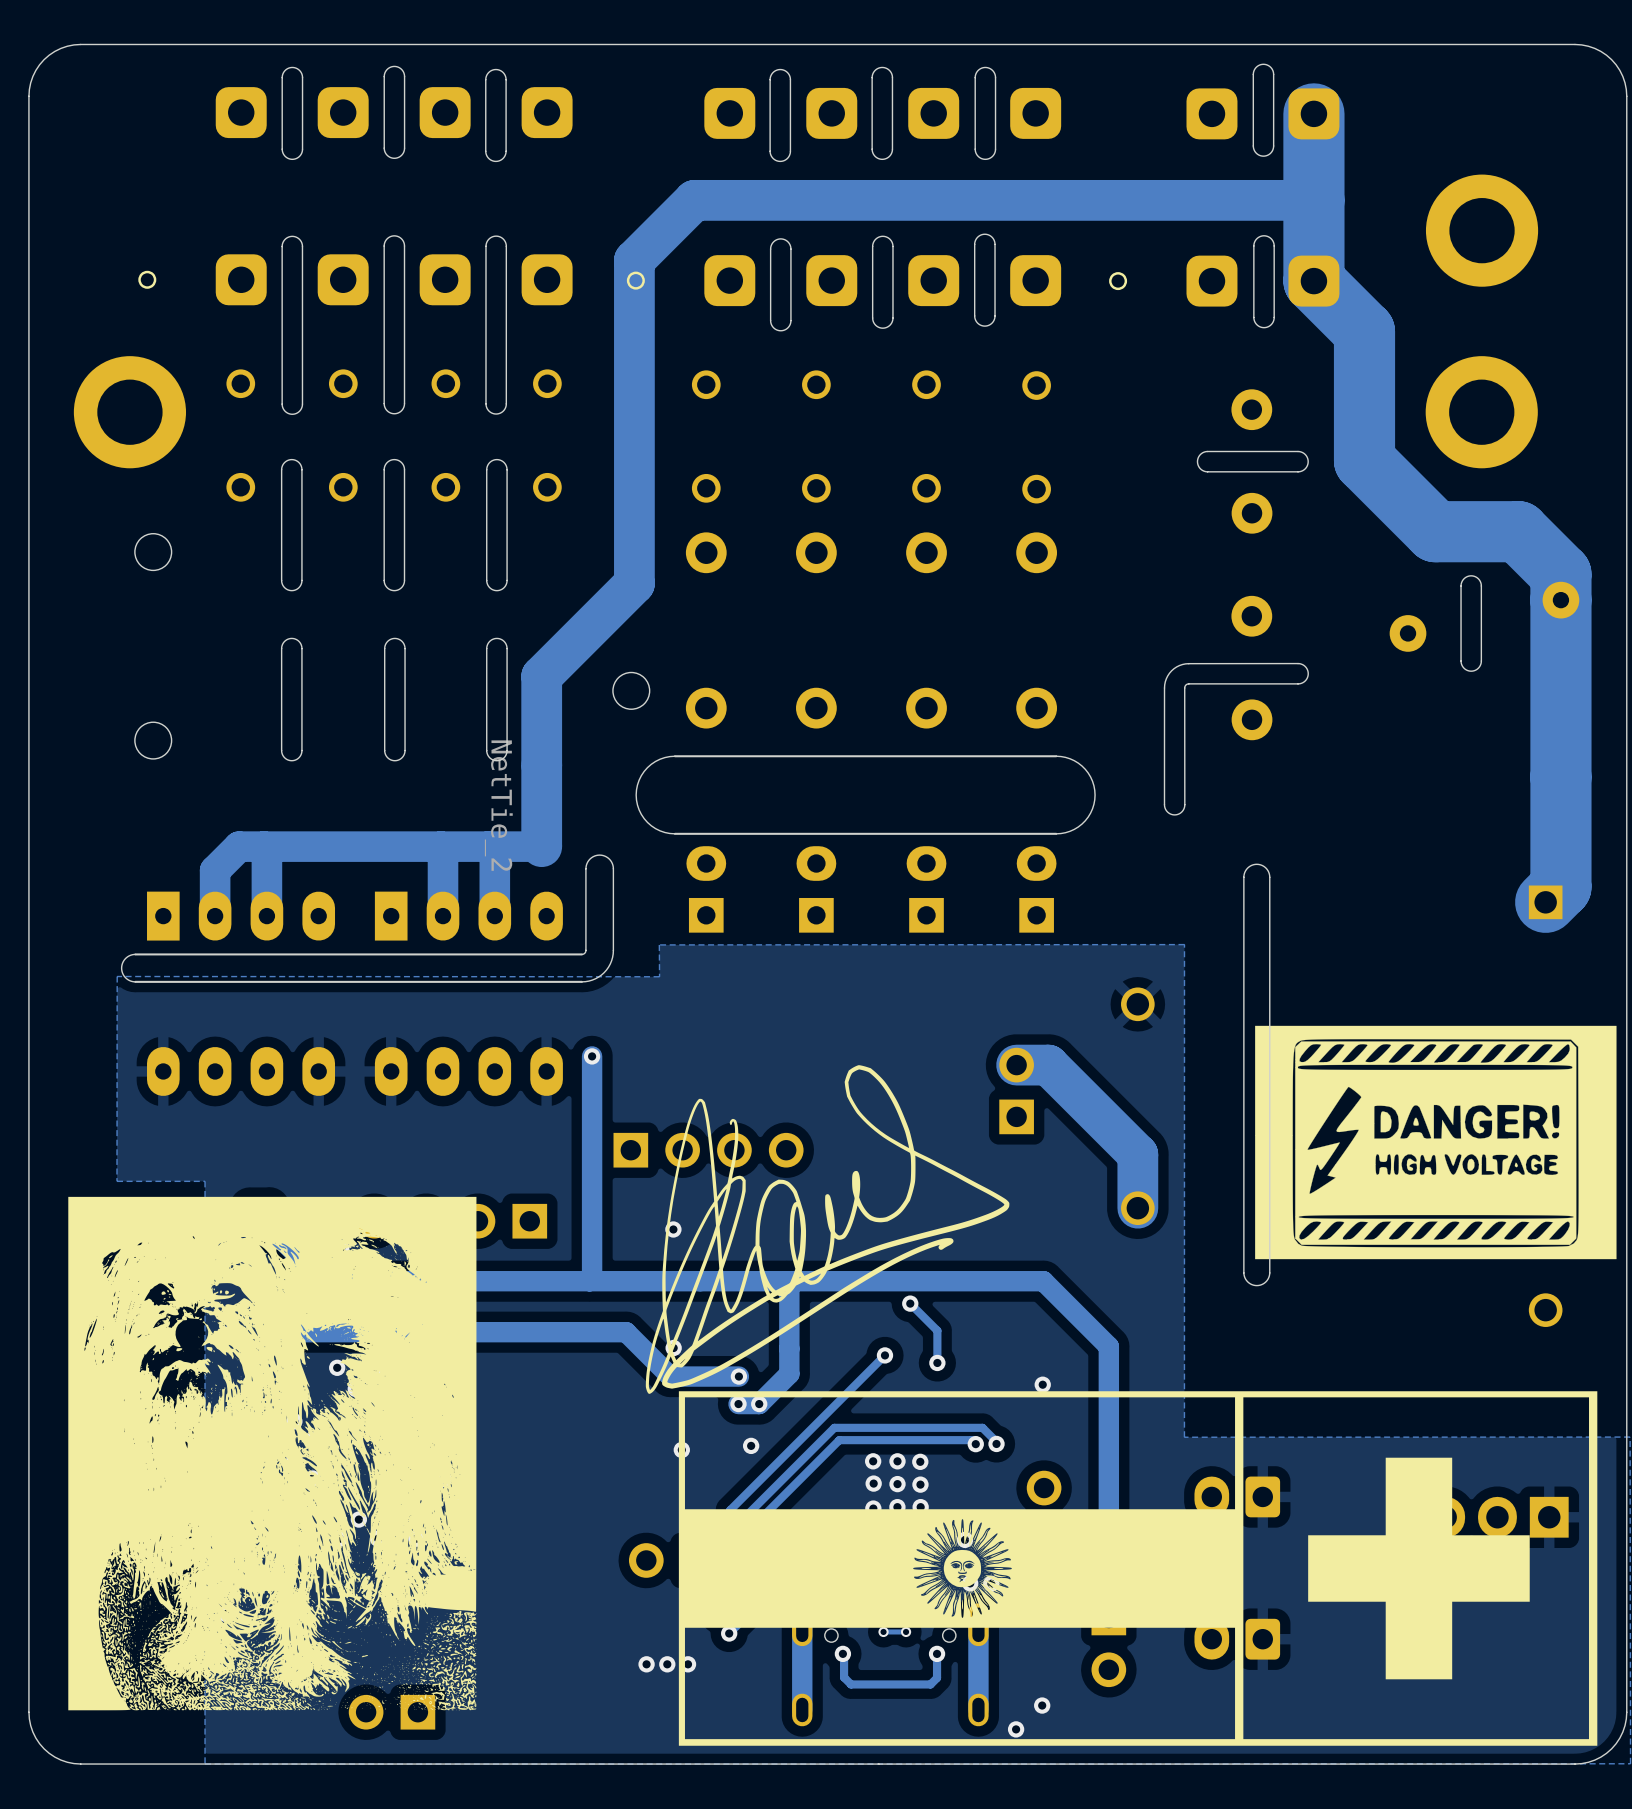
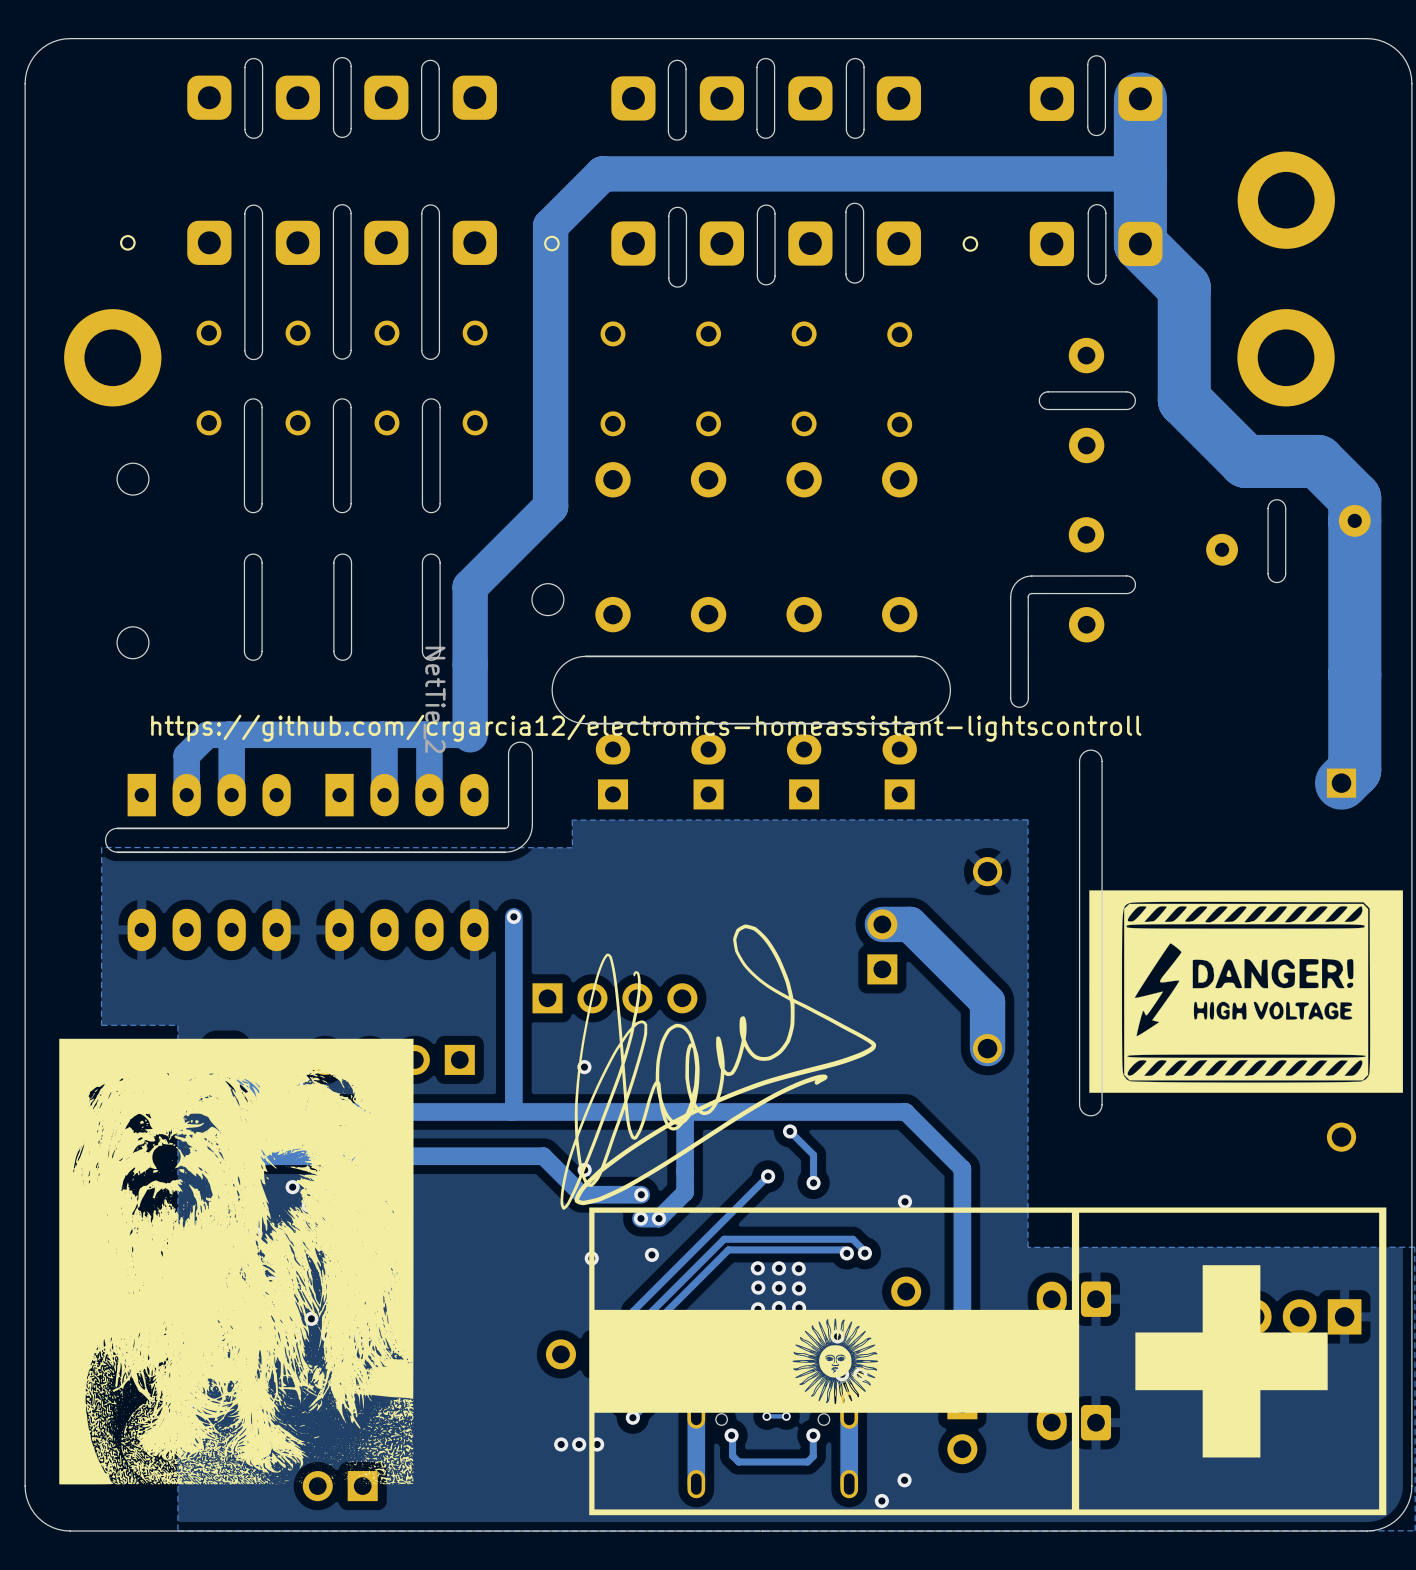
text: none -> https://github.com/crgarcia12/electronics-homeassistant-lightscontroll (646, 728)

